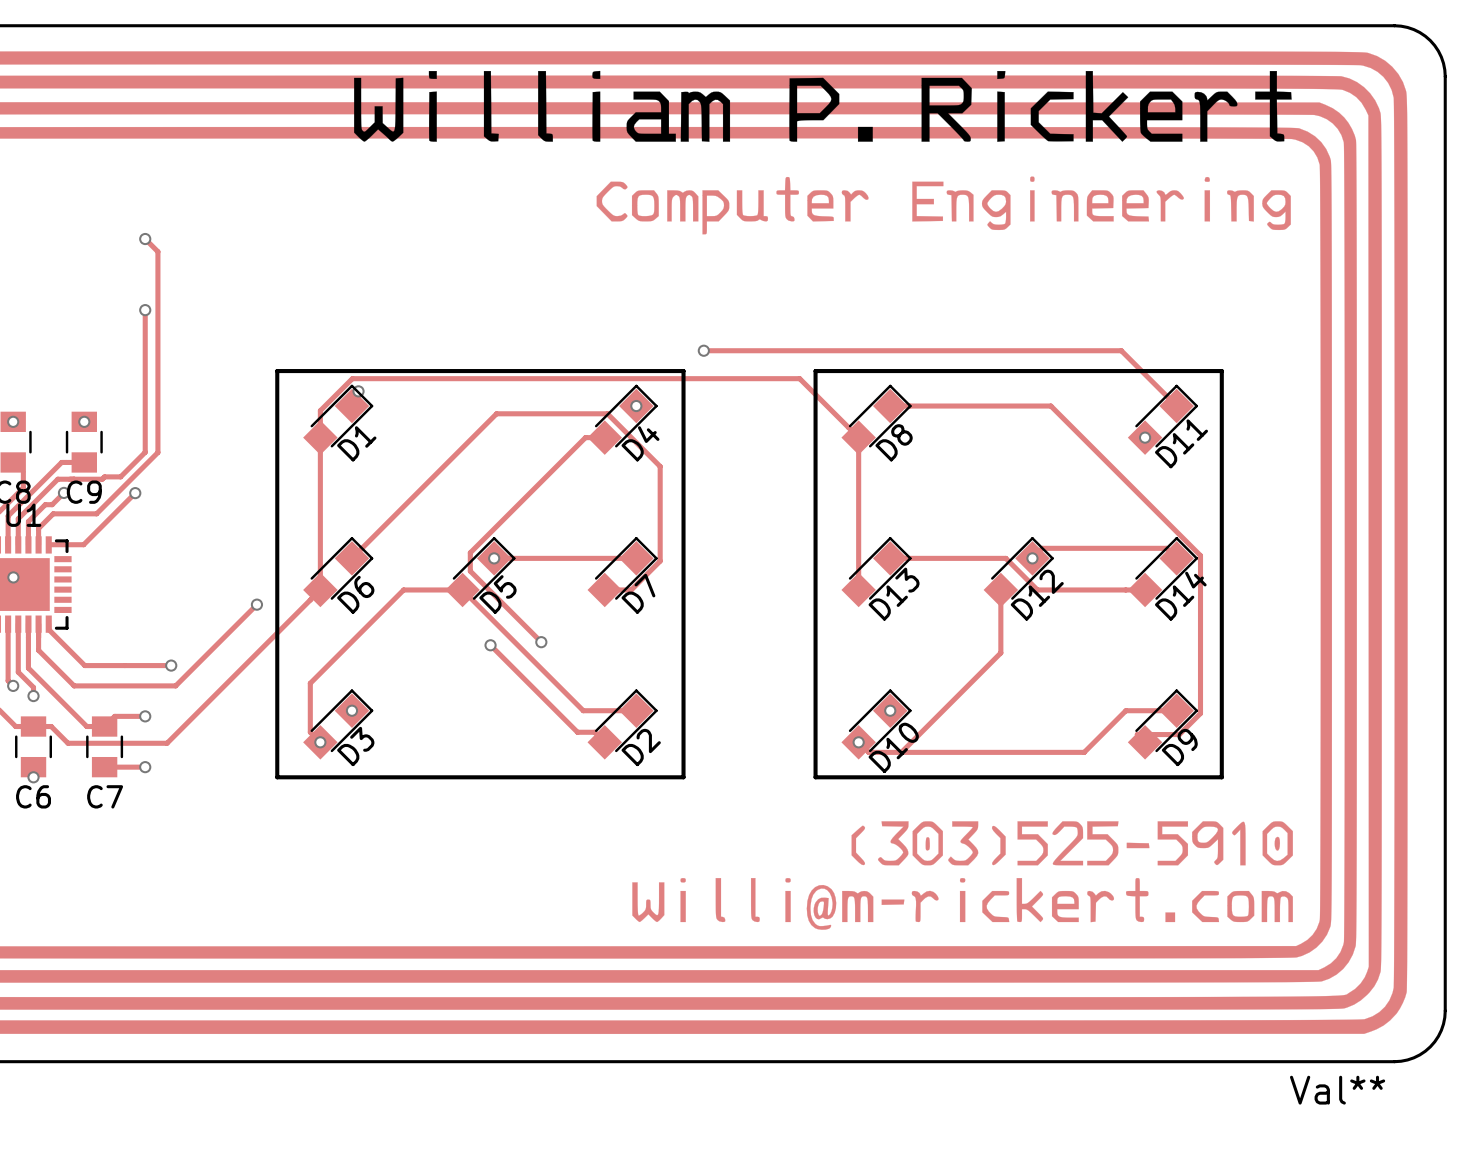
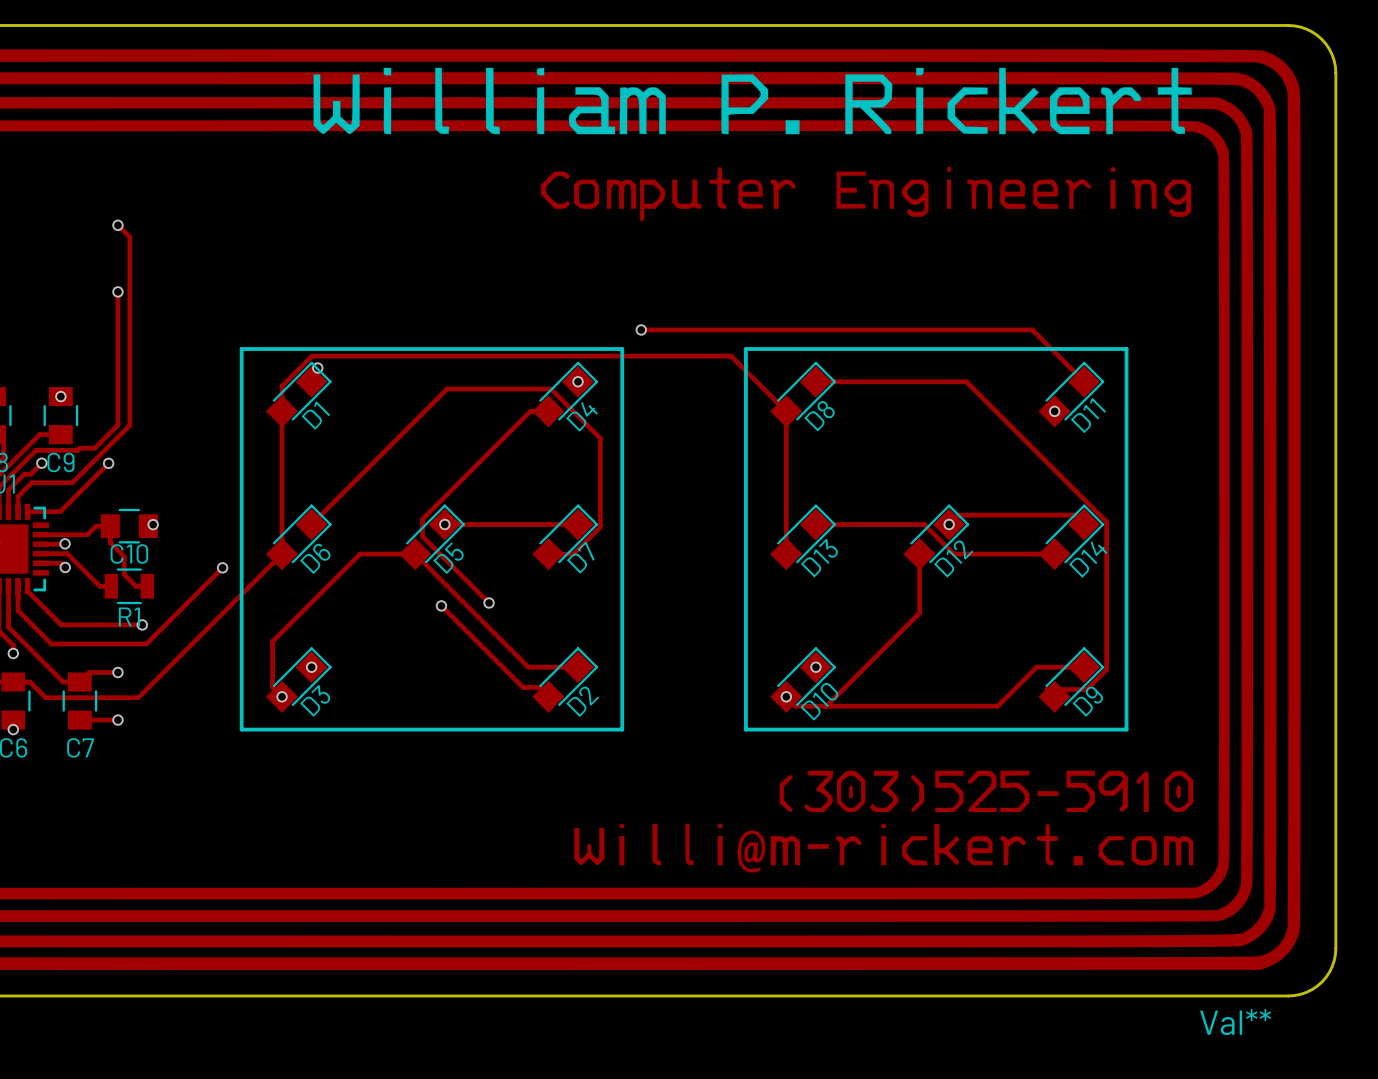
via: none -> (153, 524)
C10: none -> (129, 526)
track: none -> (40, 534) (87, 534) (96, 526) (110, 526) (110, 542) (124, 556) (124, 574) (136, 586) (147, 586)
track: none -> (65, 543) (40, 544)
via: none -> (65, 543)
track: none -> (40, 553) (67, 553) (99, 586) (111, 586)
track: none -> (40, 563) (61, 563) (65, 567)
via: none -> (65, 567)
R1: none -> (129, 586)

